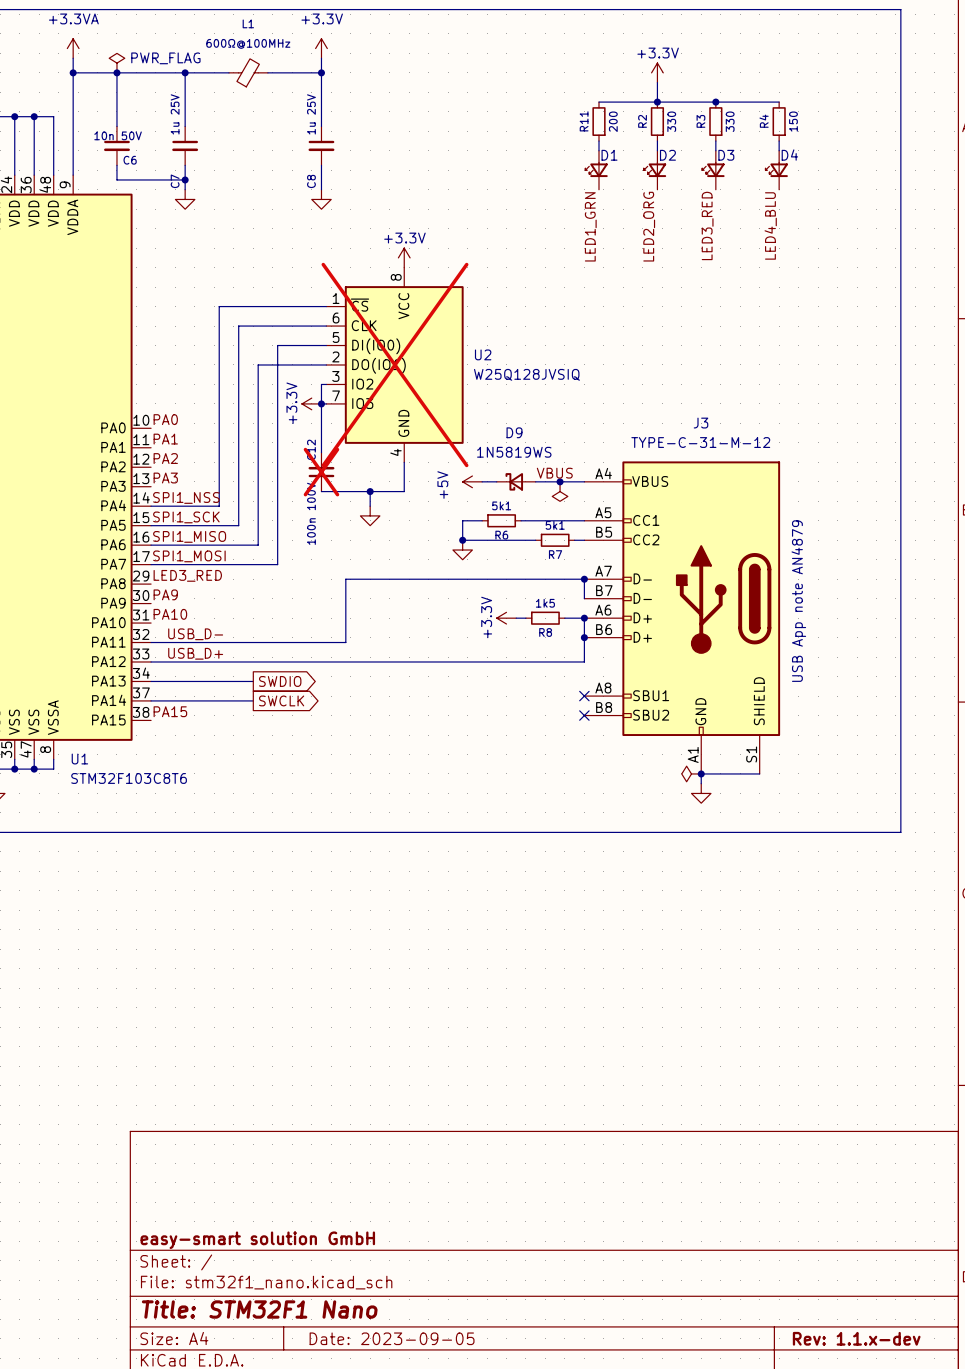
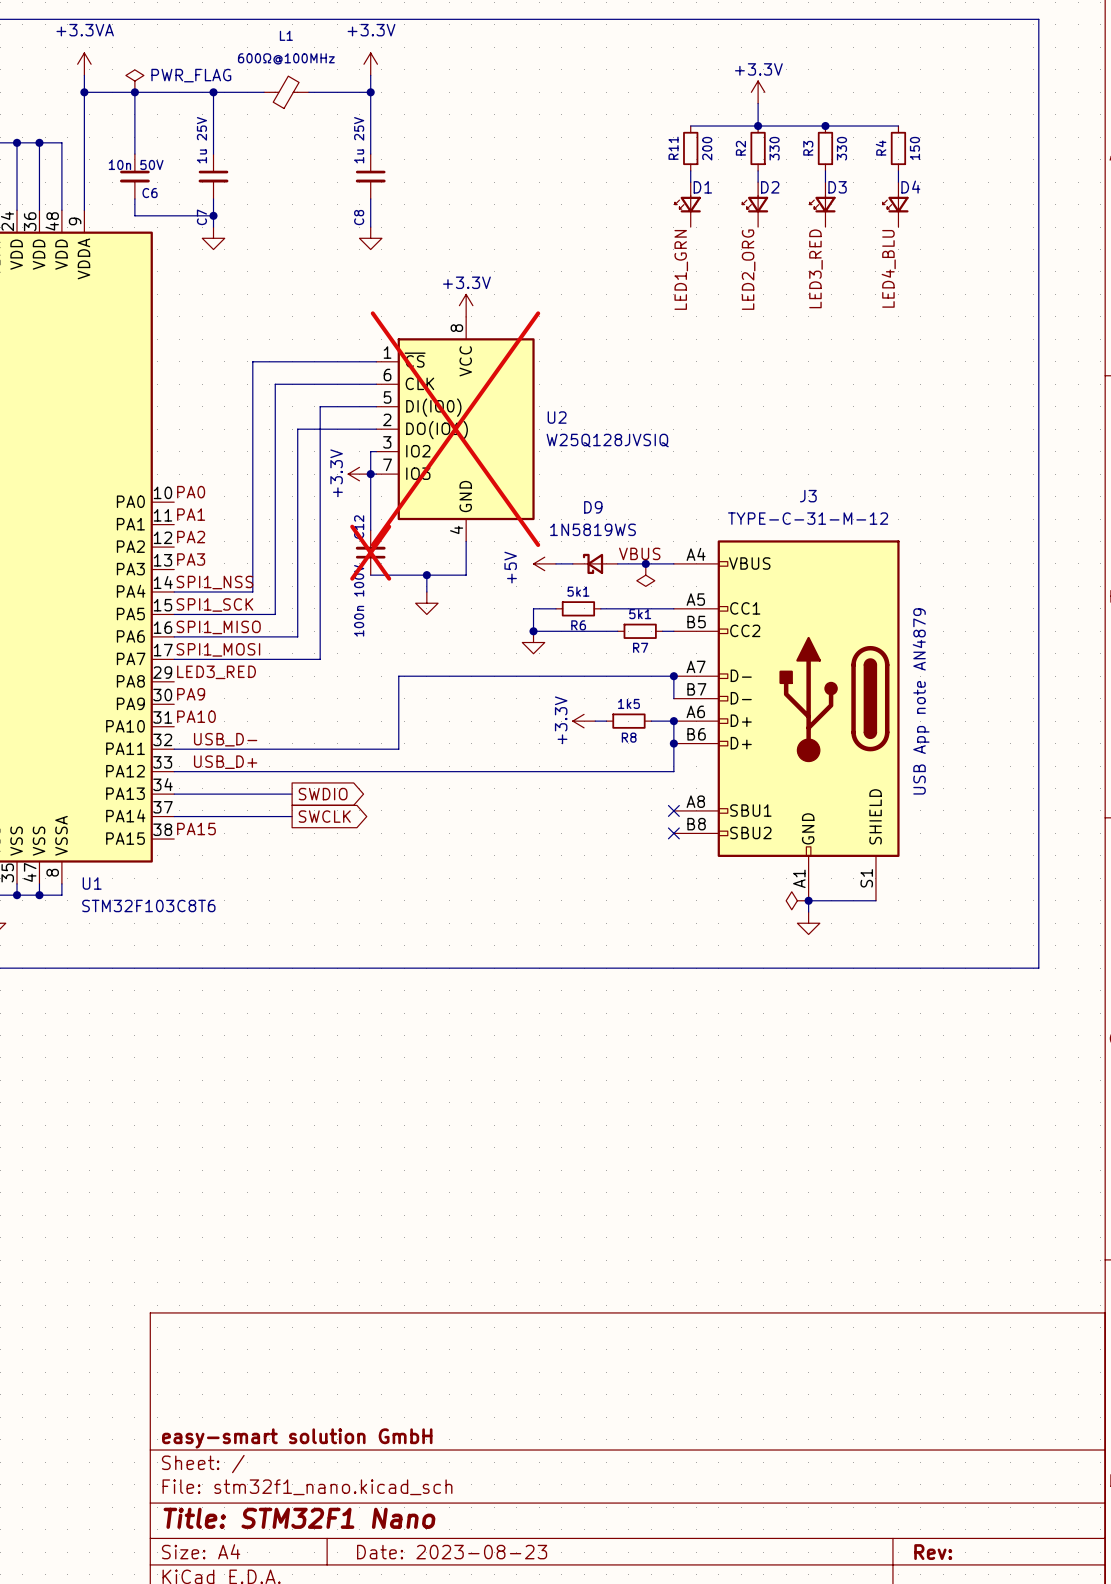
title block: Date: 2023-09-05 (392, 1338) -> Date: 2023-08-23 (452, 1552)
title block: Rev: 1.1.x-dev (856, 1338) -> Rev: (933, 1552)

